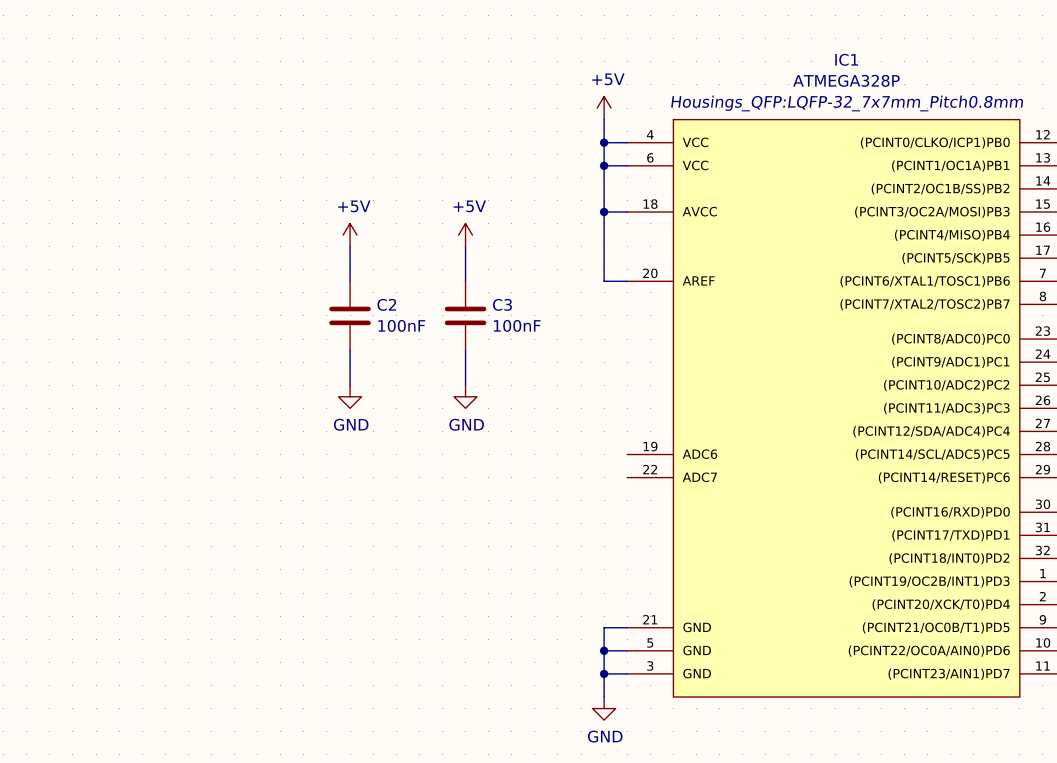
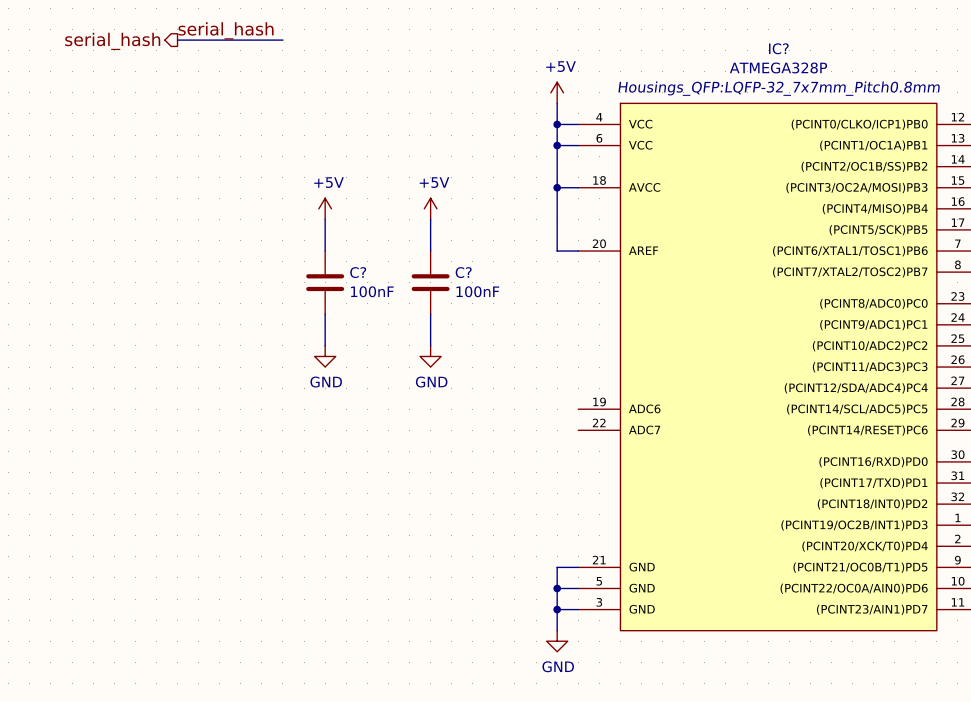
label: none -> serial_hash (226, 30)
wire: none -> (177, 40) (282, 40)
hierarchical label: none -> serial_hash (112, 41)
IC1 name: IC1 (846, 59) -> IC? (778, 48)
C2 name: C2 (386, 304) -> C? (358, 272)
C3 name: C3 (502, 304) -> C? (463, 272)

